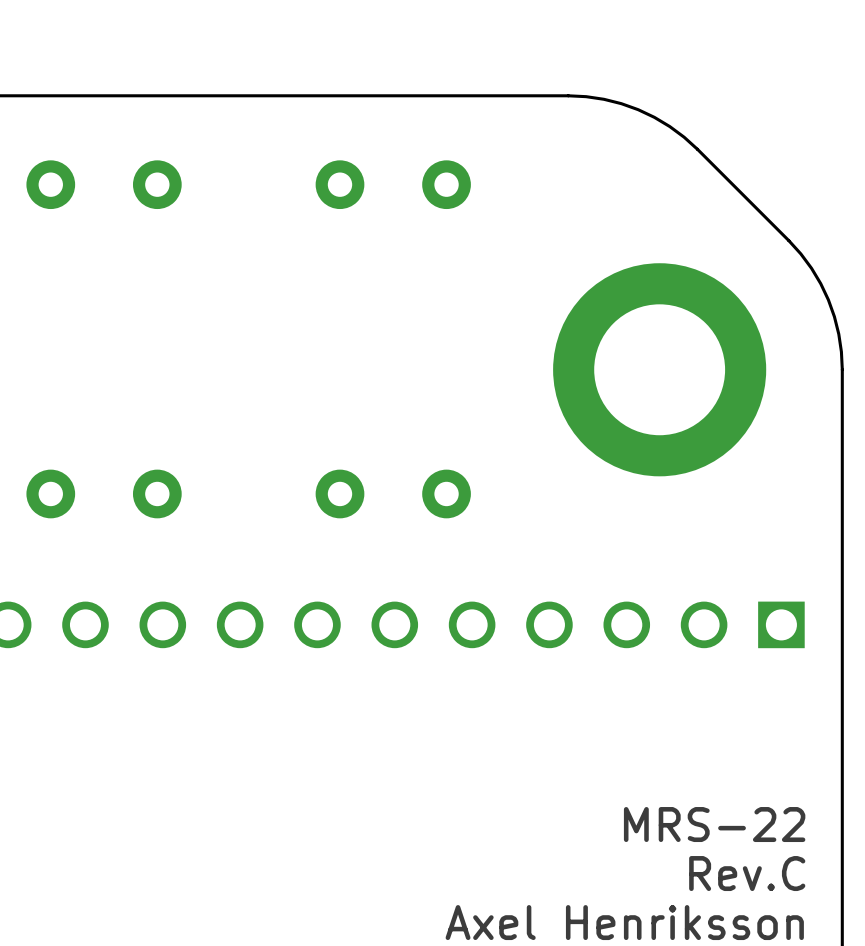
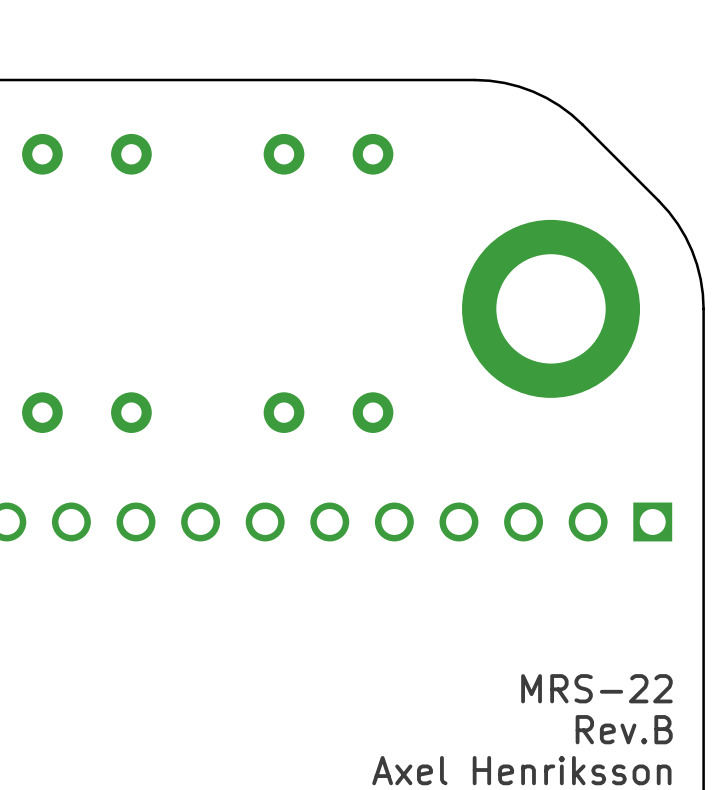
text: Rev.C (747, 873) -> Rev.B (624, 729)

